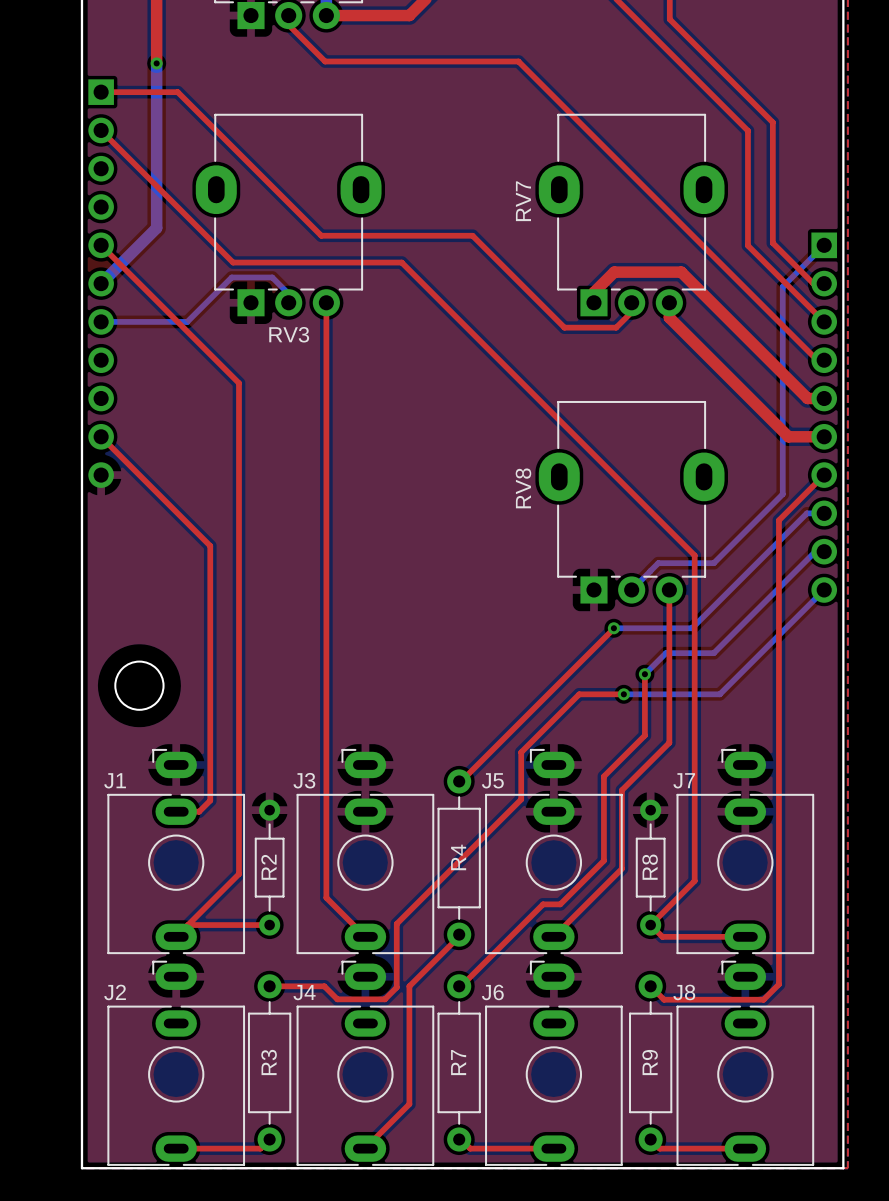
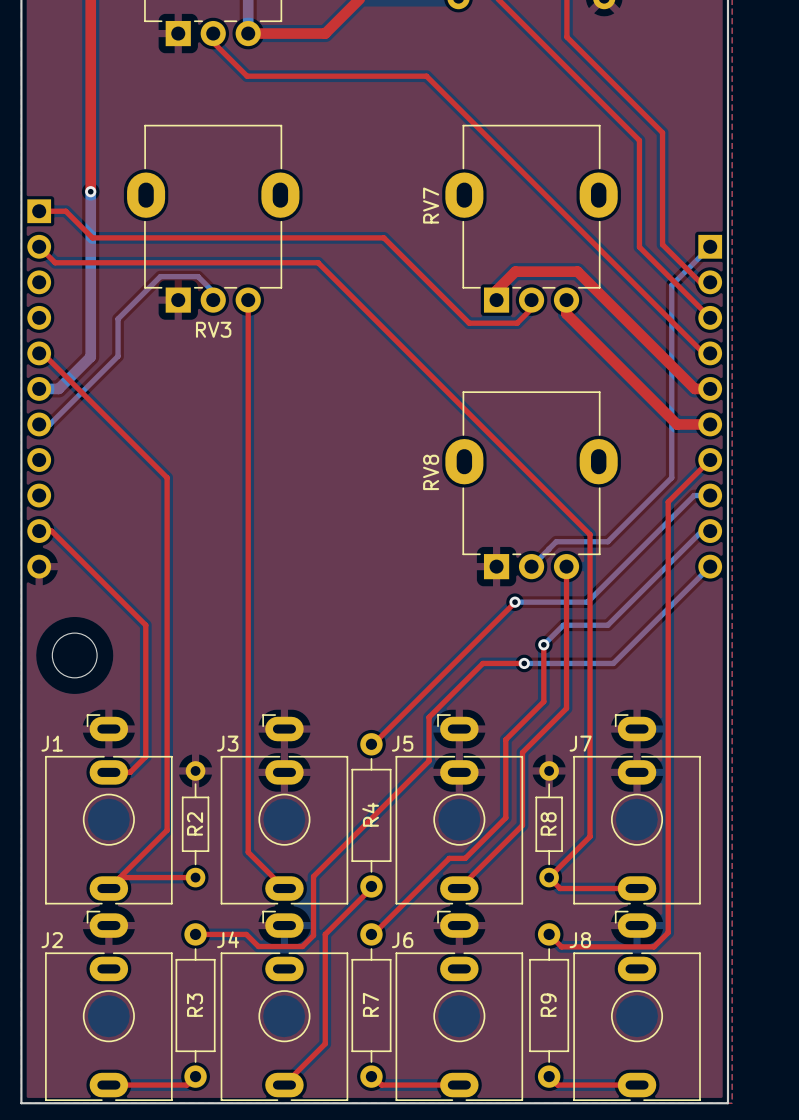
top track: none -> (90, 77) (90, 191)
bottom track: (156, 63) (156, 185) -> none
via: (156, 63) -> none
top track: (101, 92) (177, 92) (321, 235) -> (39, 211) (65, 211) (92, 237) (243, 237)
top track: (101, 130) (233, 262) -> (55, 262) (161, 262)
via: none -> (90, 191)
bottom track: (156, 228) (101, 283) -> (90, 230) (90, 356) (58, 388) (39, 388)
top track: (118, 262) (238, 383) (238, 494) -> (42, 353) (167, 477)
part position: (101, 283) -> (39, 388)
bottom track: (101, 321) (187, 321) -> (39, 424) (49, 424) (118, 356) (119, 317)
top track: (101, 436) (210, 545) (210, 800) -> (39, 531) (51, 531) (145, 625) (145, 756) (140, 762)

